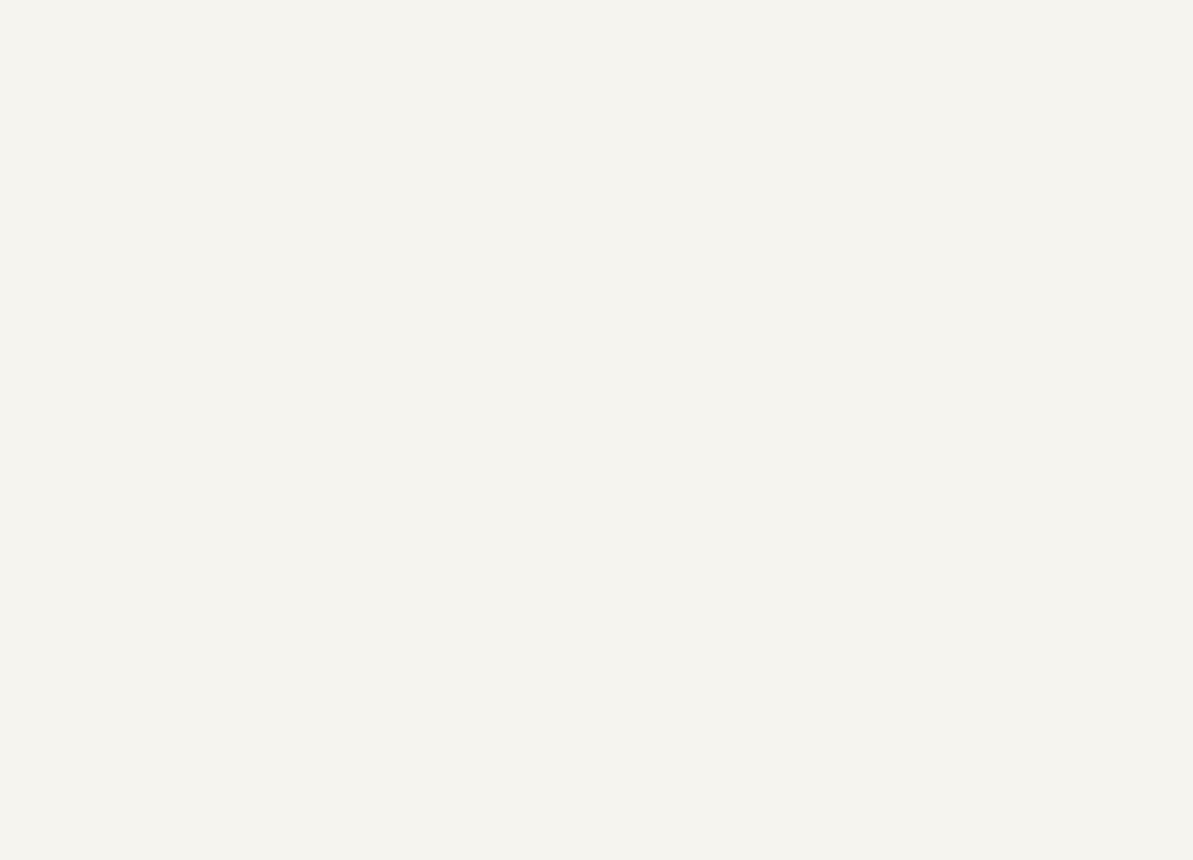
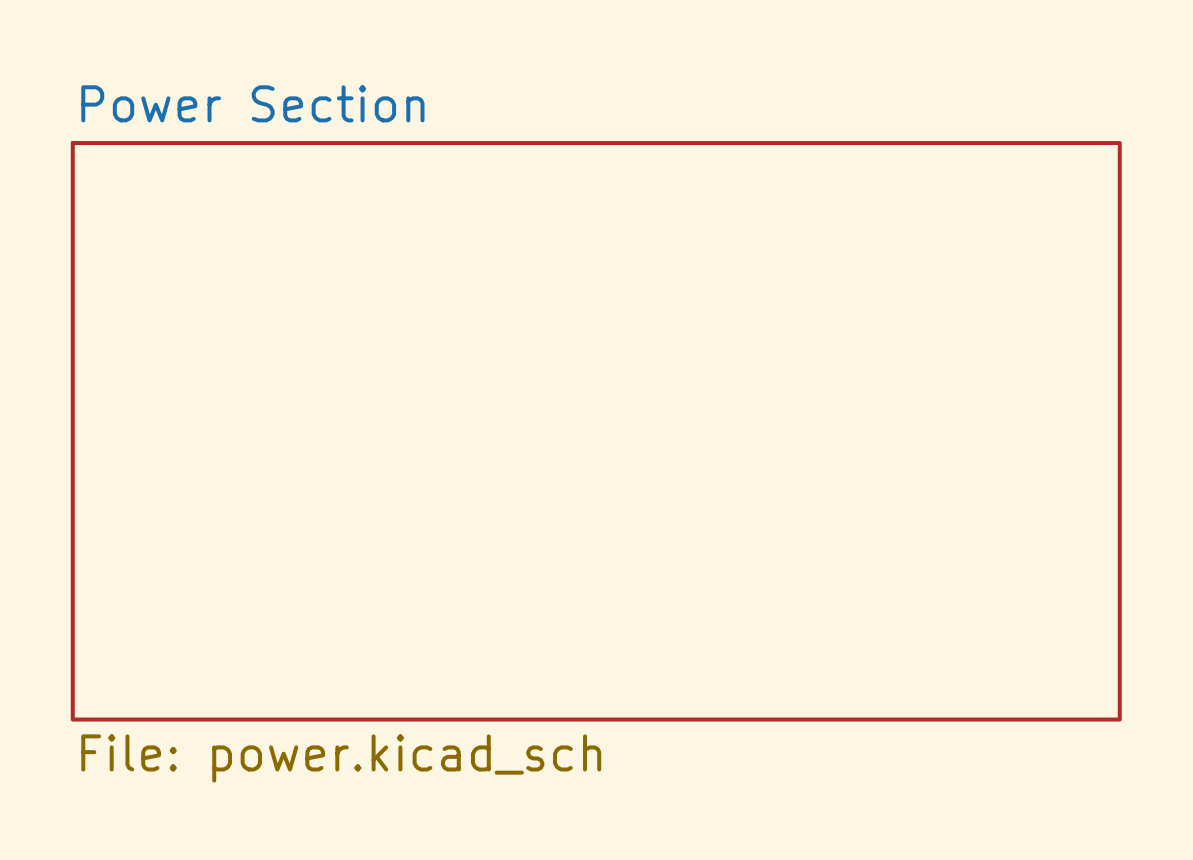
sheet Power Section: none -> File: power.kicad_sch (596, 431)

